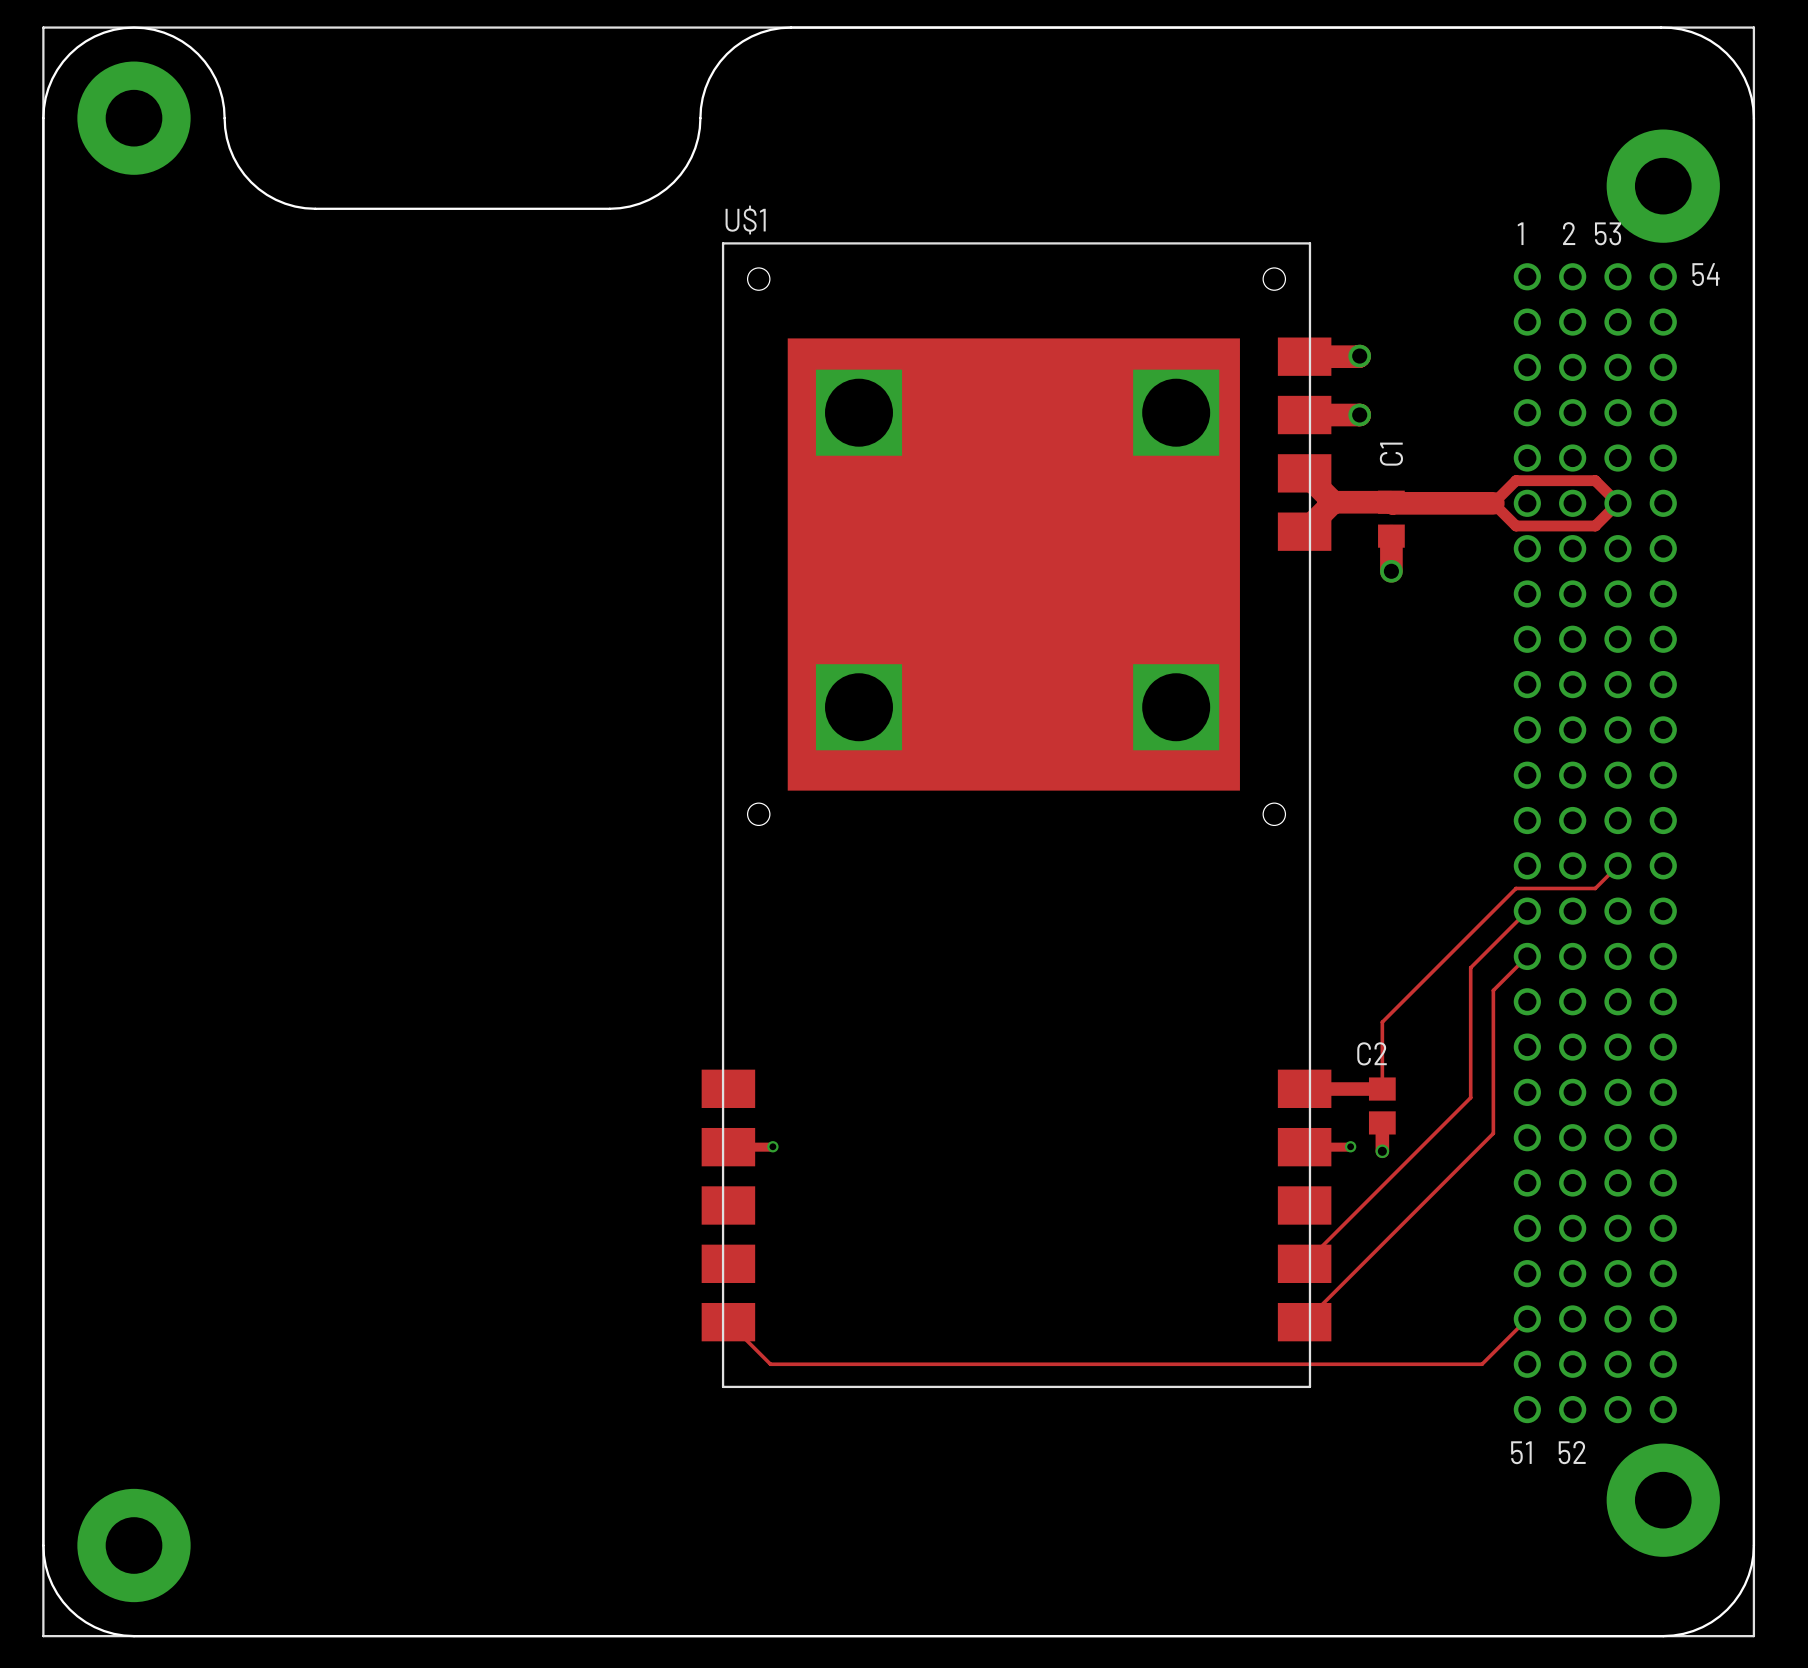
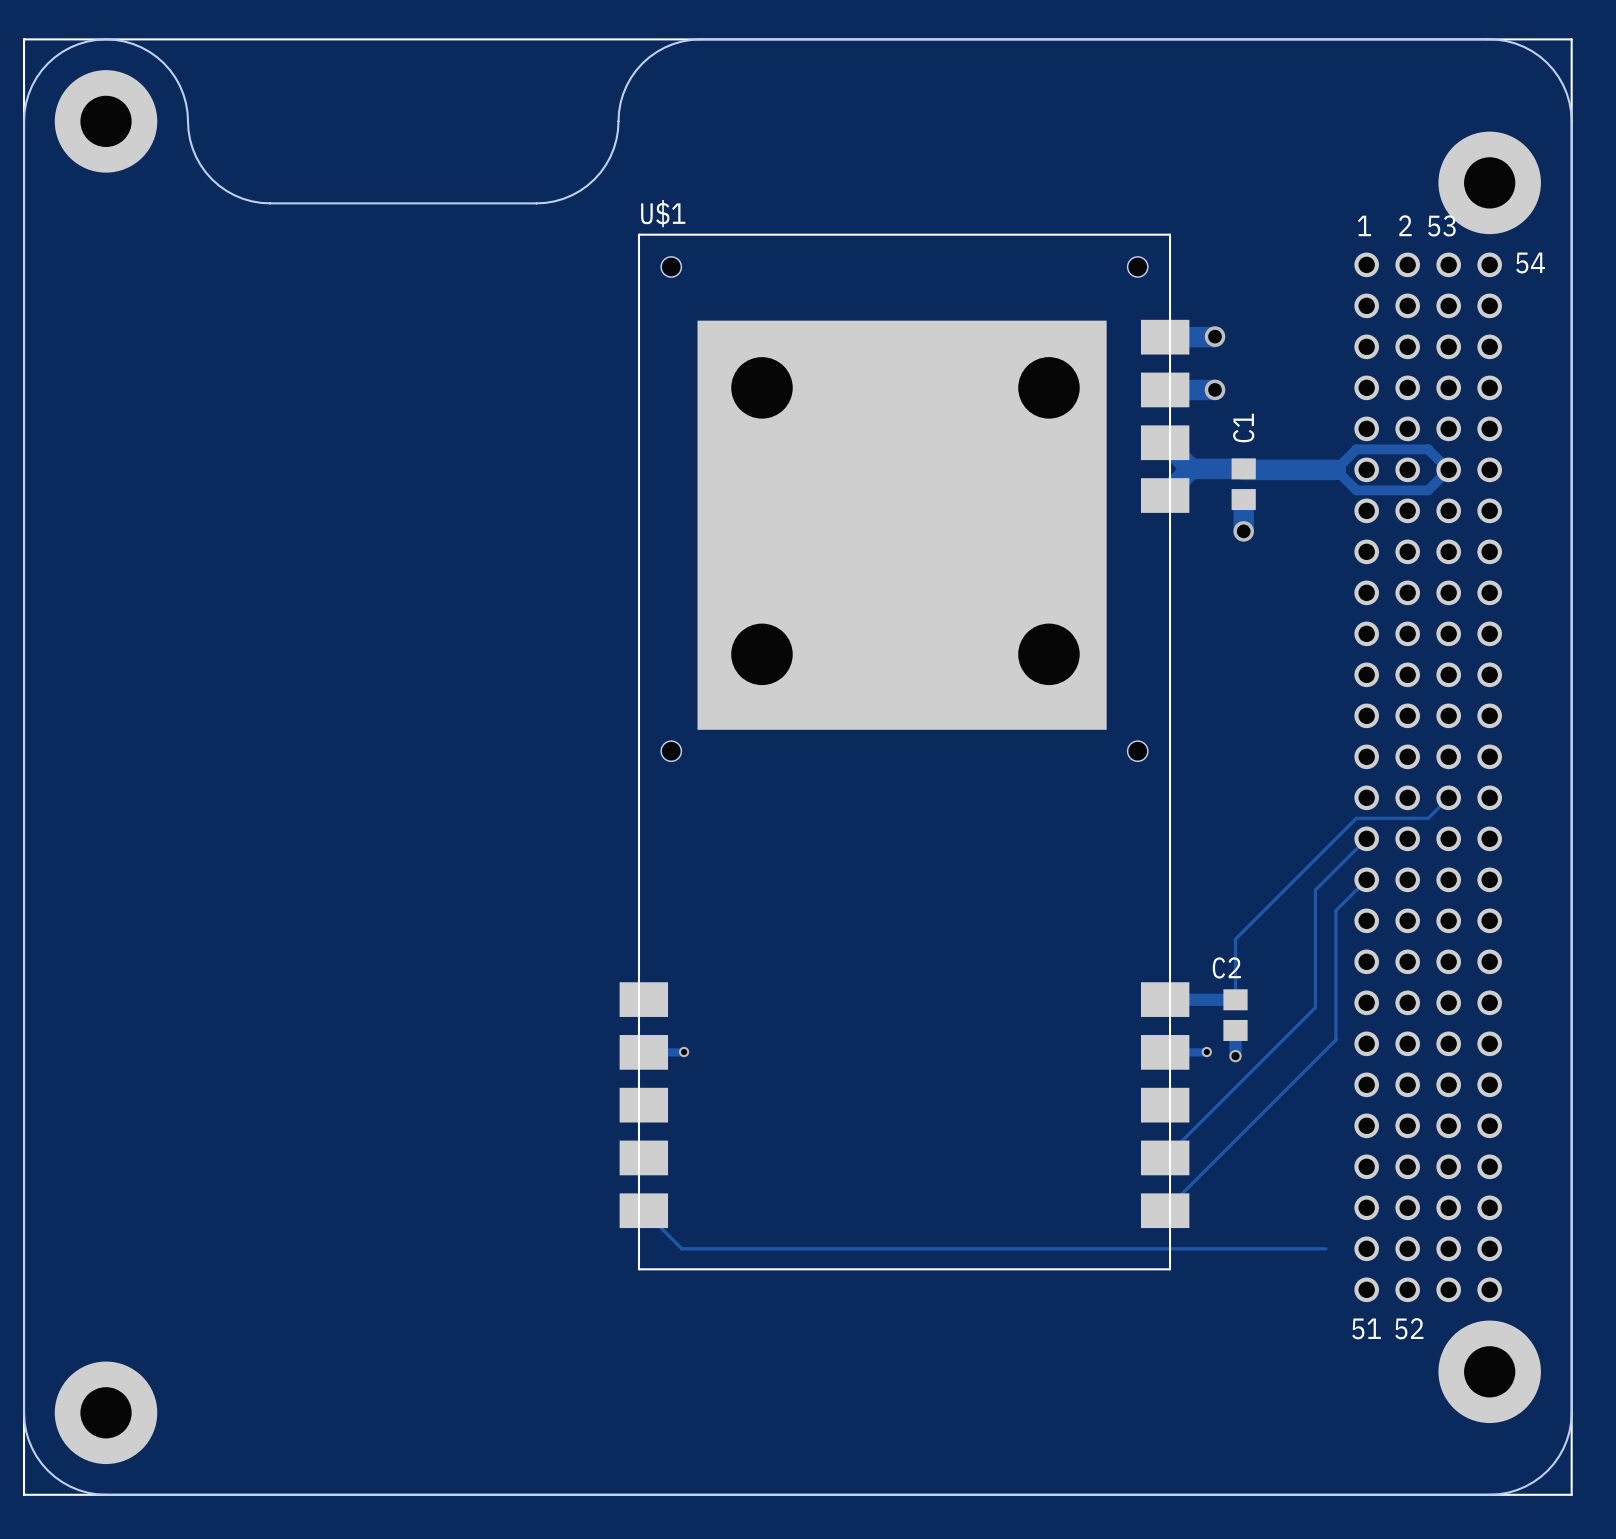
track: (1527, 1318) (1482, 1364) -> none

